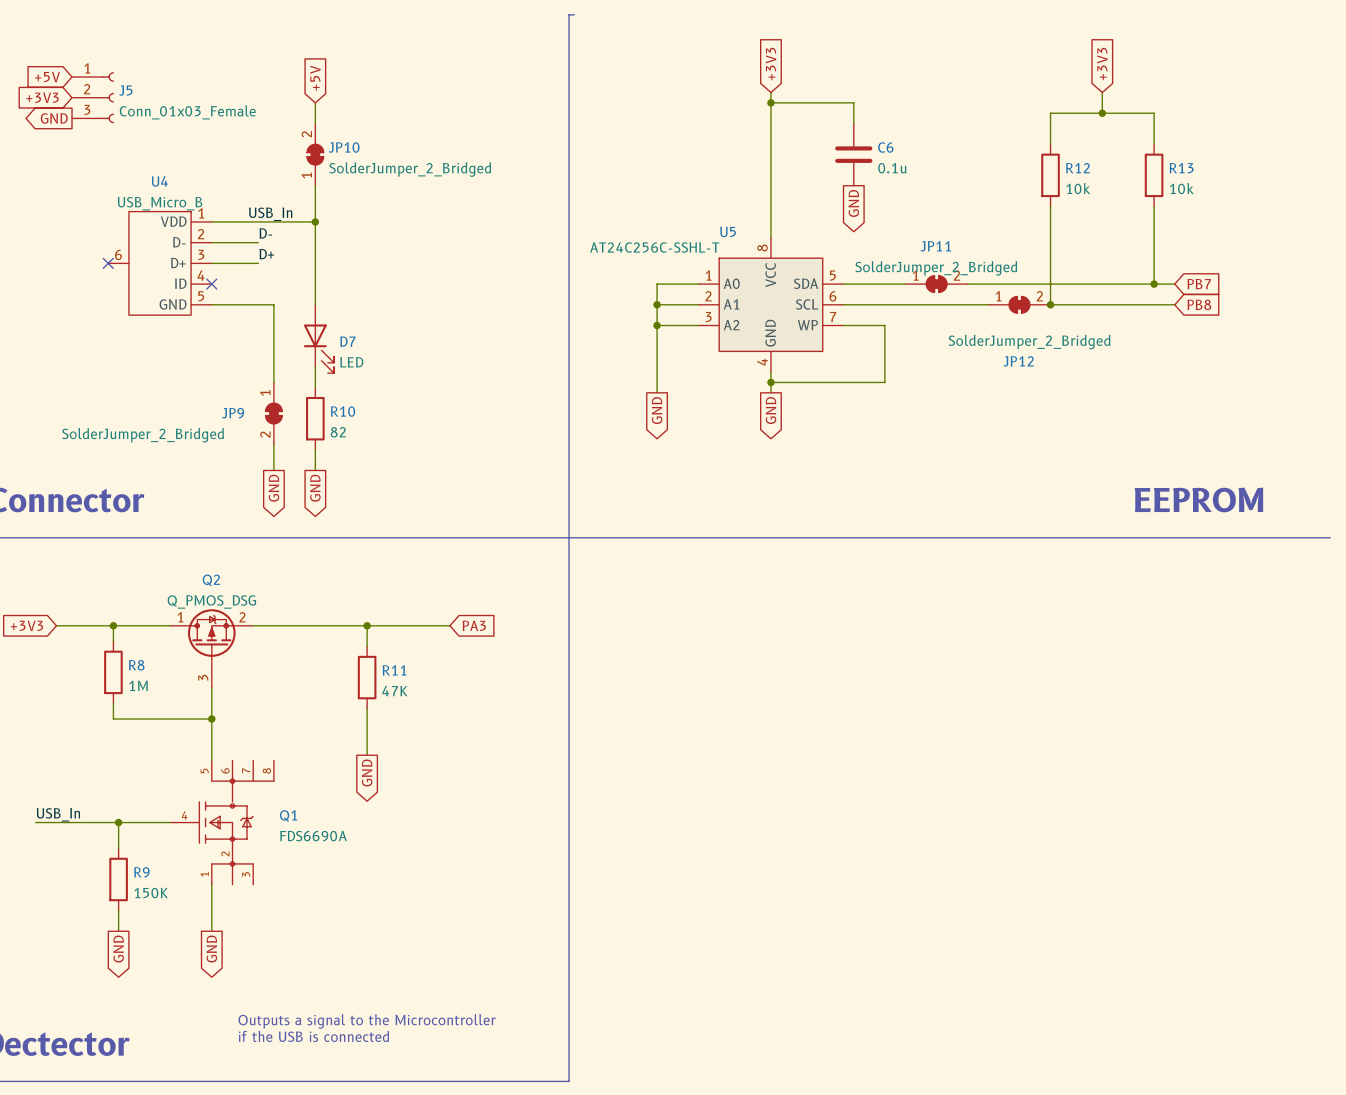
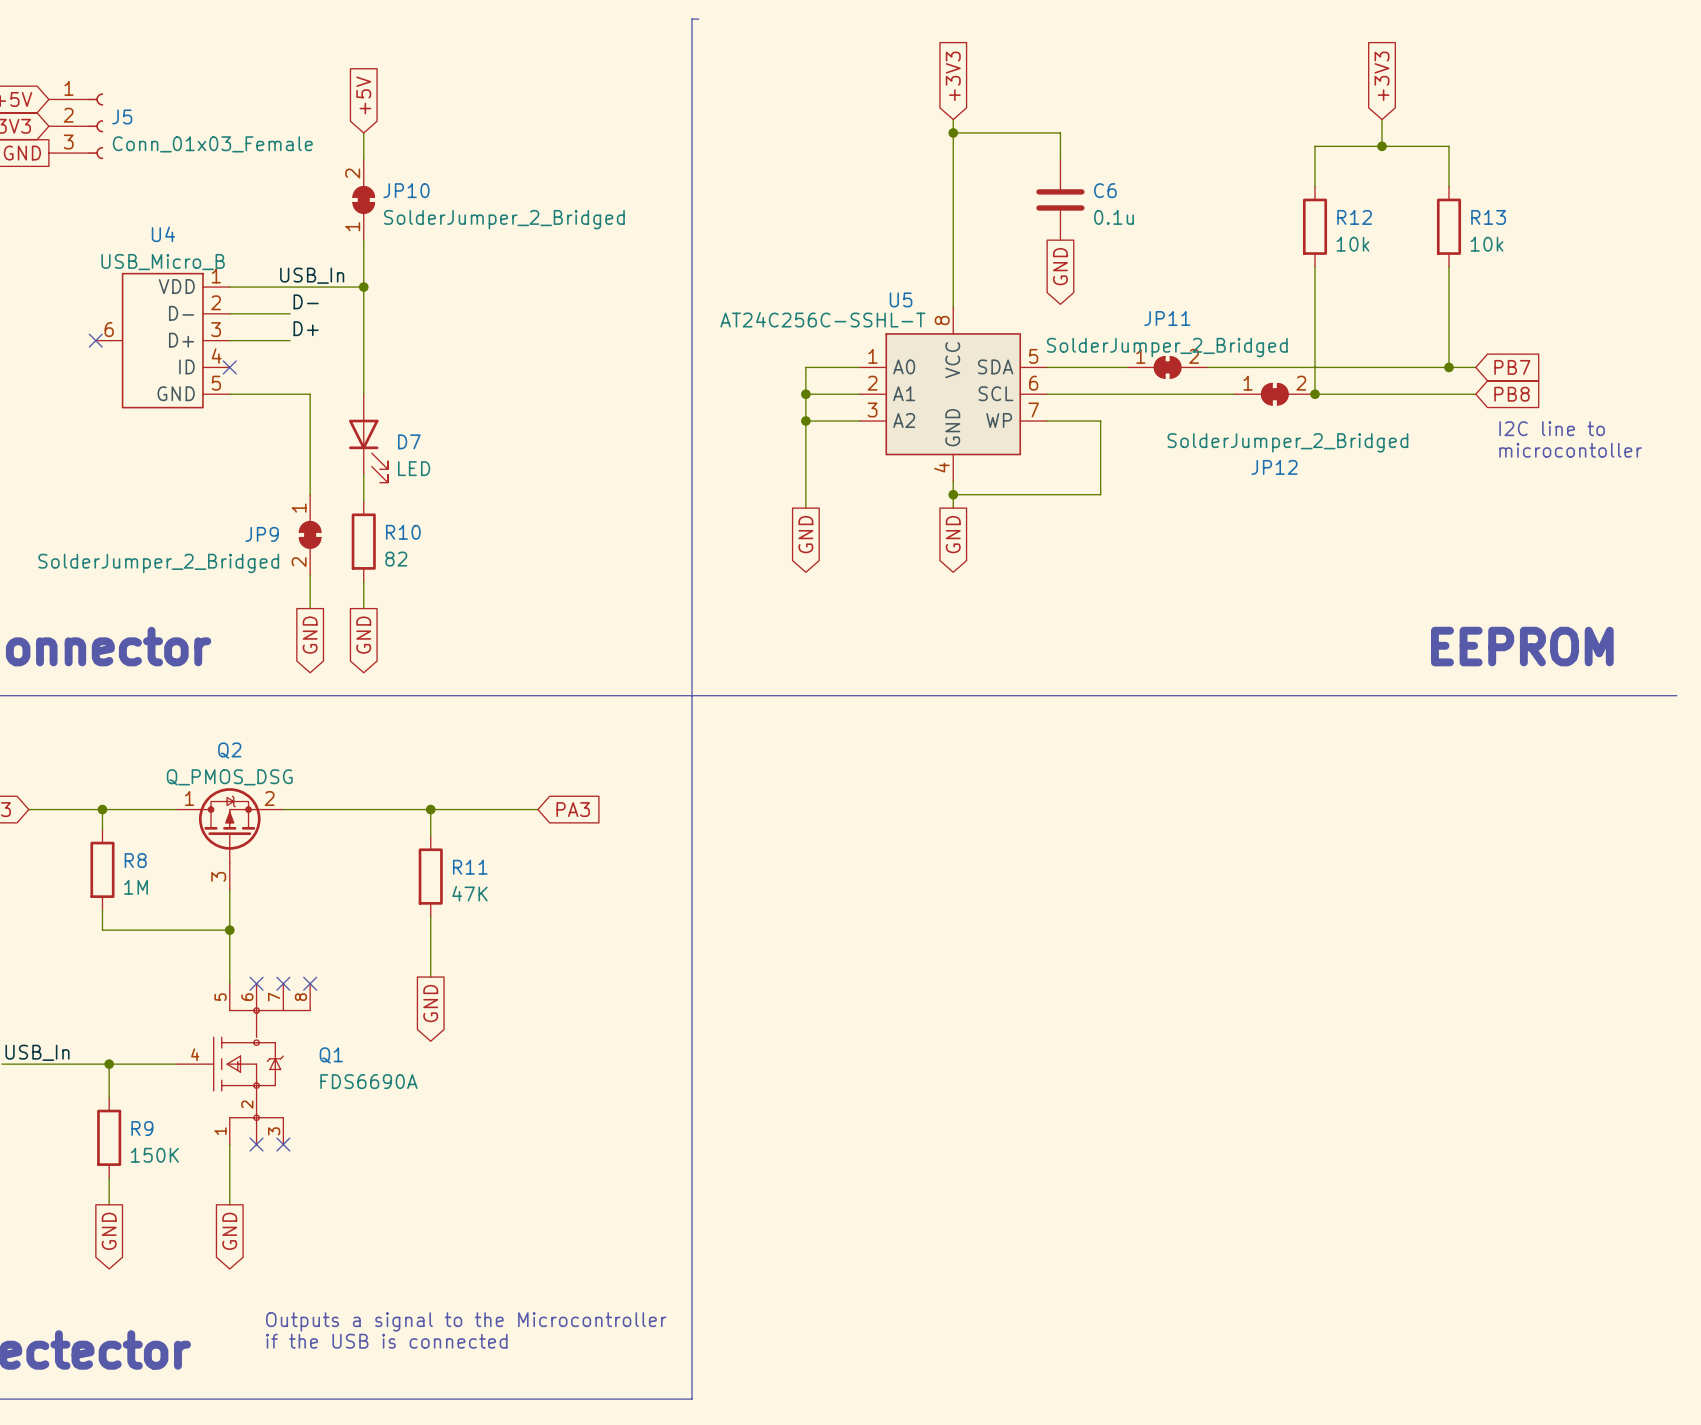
text: none -> I2C line to (1552, 428)
text: none -> microcontoller (1570, 450)
no-connect mark: none -> (256, 983)
no-connect mark: none -> (283, 983)
no-connect mark: none -> (310, 983)
no-connect mark: none -> (256, 1144)
no-connect mark: none -> (283, 1144)

